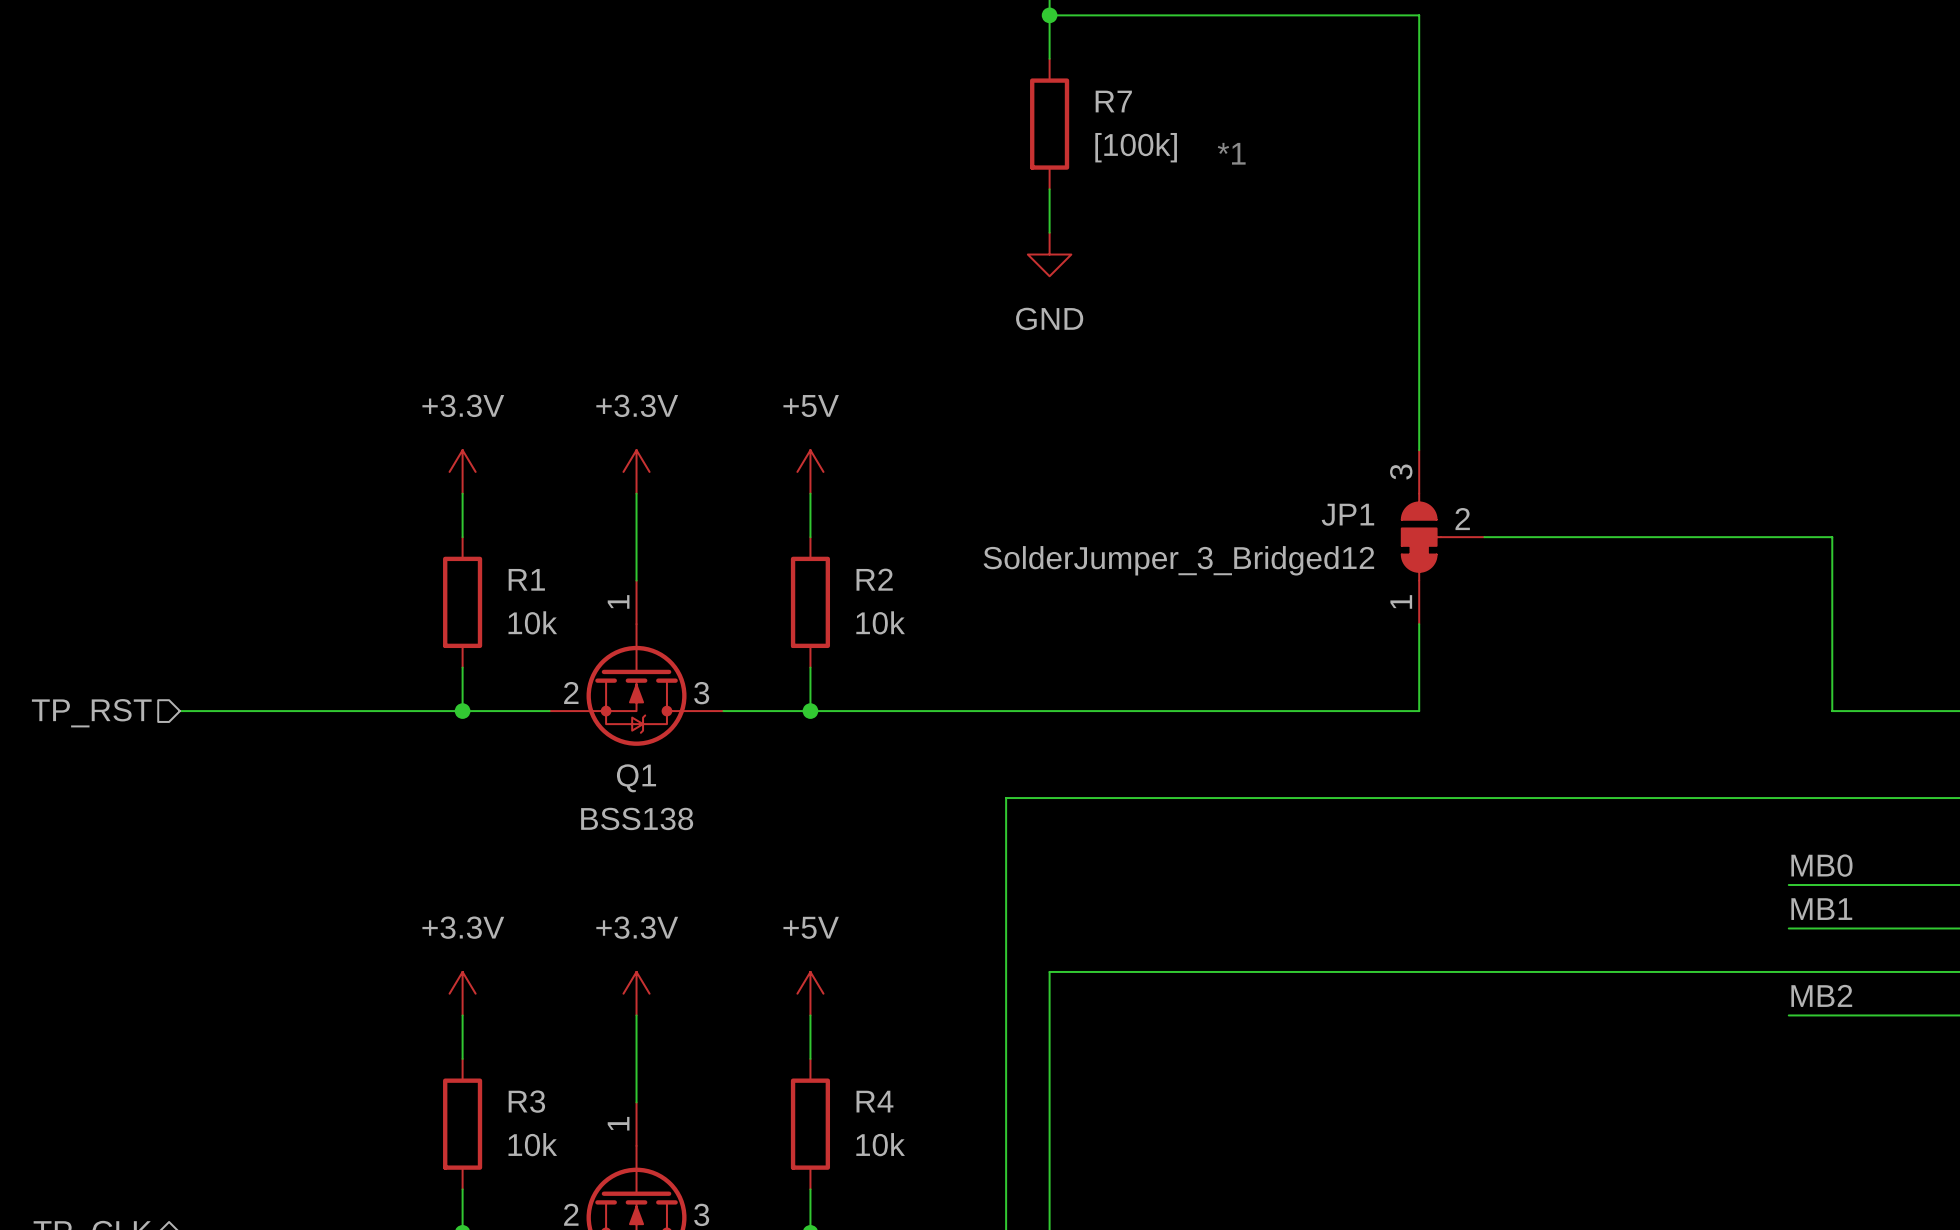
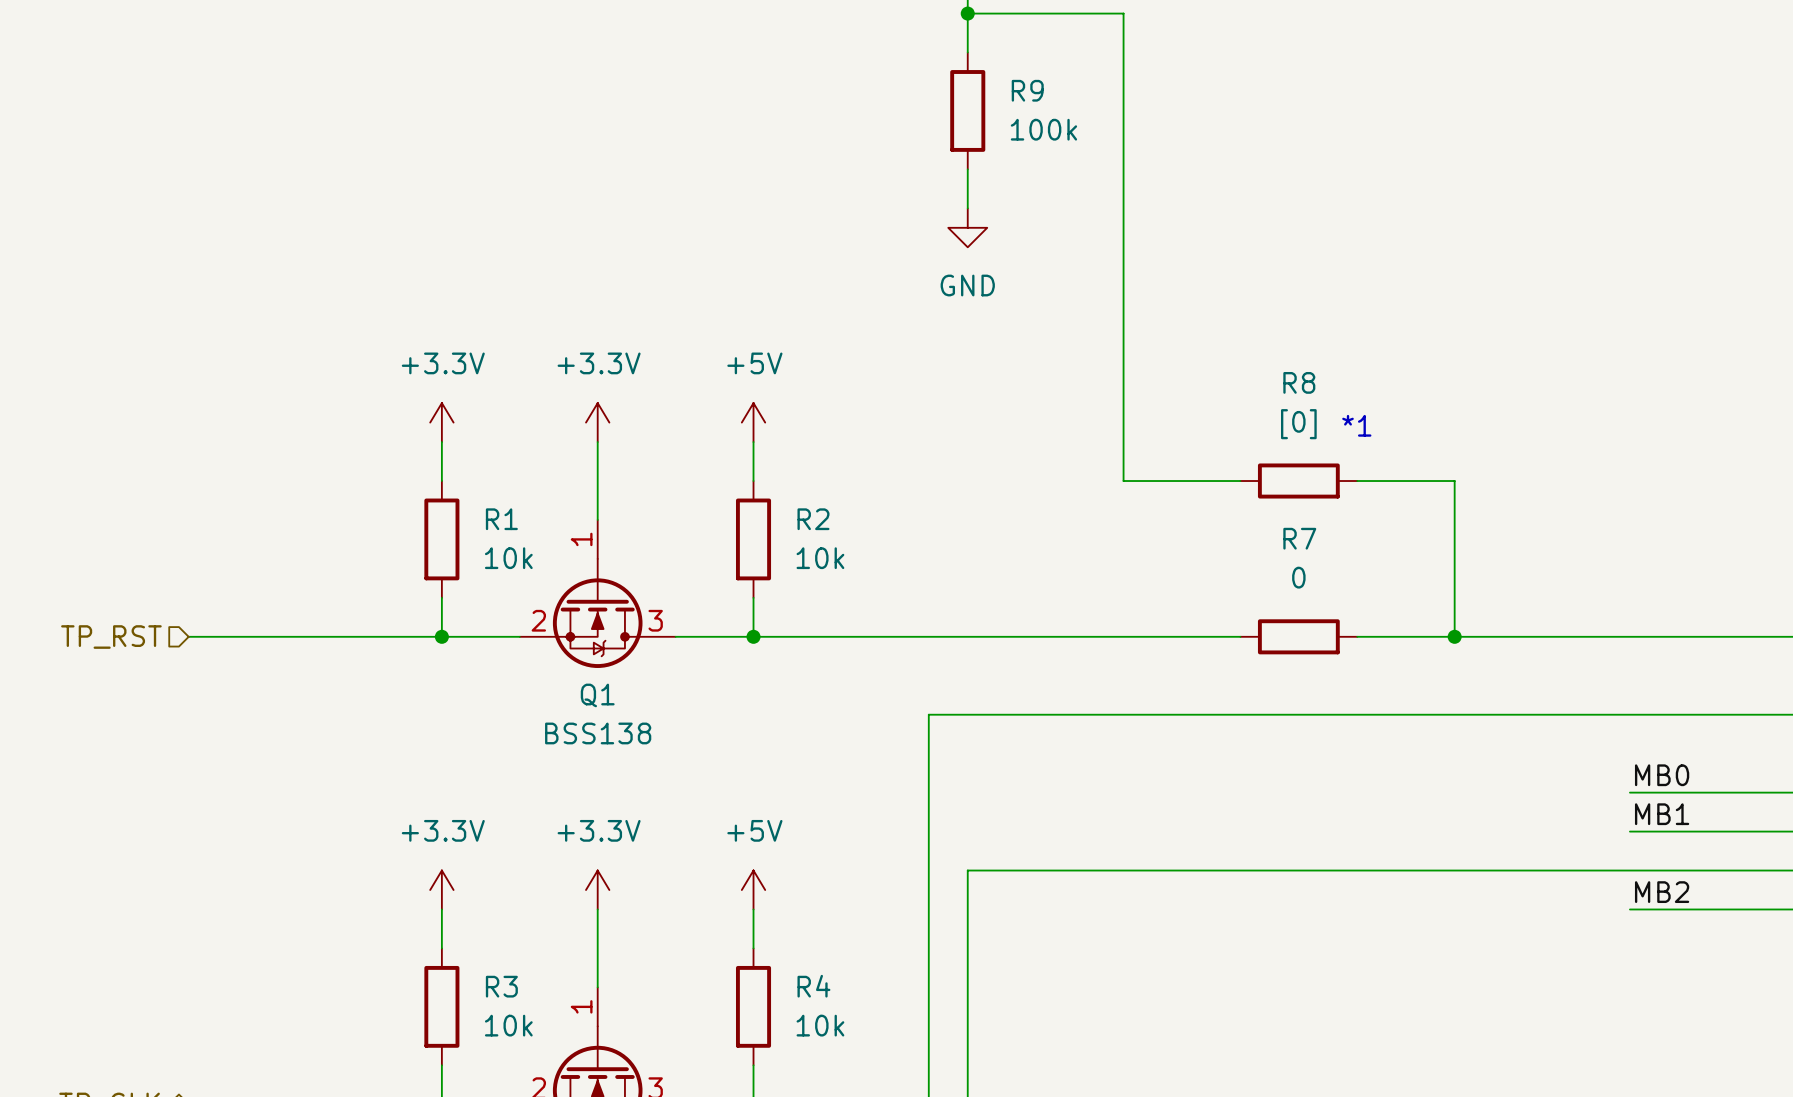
wire: (1223, 15) (1419, 15) (1419, 450) -> (1123, 13) (1123, 481) (1240, 481)
R7 name: R7 (1113, 101) -> R9 (1027, 90)
R7 value: [100k] (1136, 147) -> 100k (1043, 129)
text position: *1 (1231, 153) -> *1 (1356, 425)
R8: none -> [0] (1298, 481)
JP1: SolderJumper_3_Bridged12 (1443, 537) -> none
wire: (1593, 537) (1832, 537) (1832, 711) -> (1357, 636) (1668, 636)
wire: none -> (1454, 481) (1454, 636)
wire: (1419, 624) (1419, 711) (1353, 711) -> none
R7: none -> 0 (1298, 636)
junction: none -> (1454, 636)

